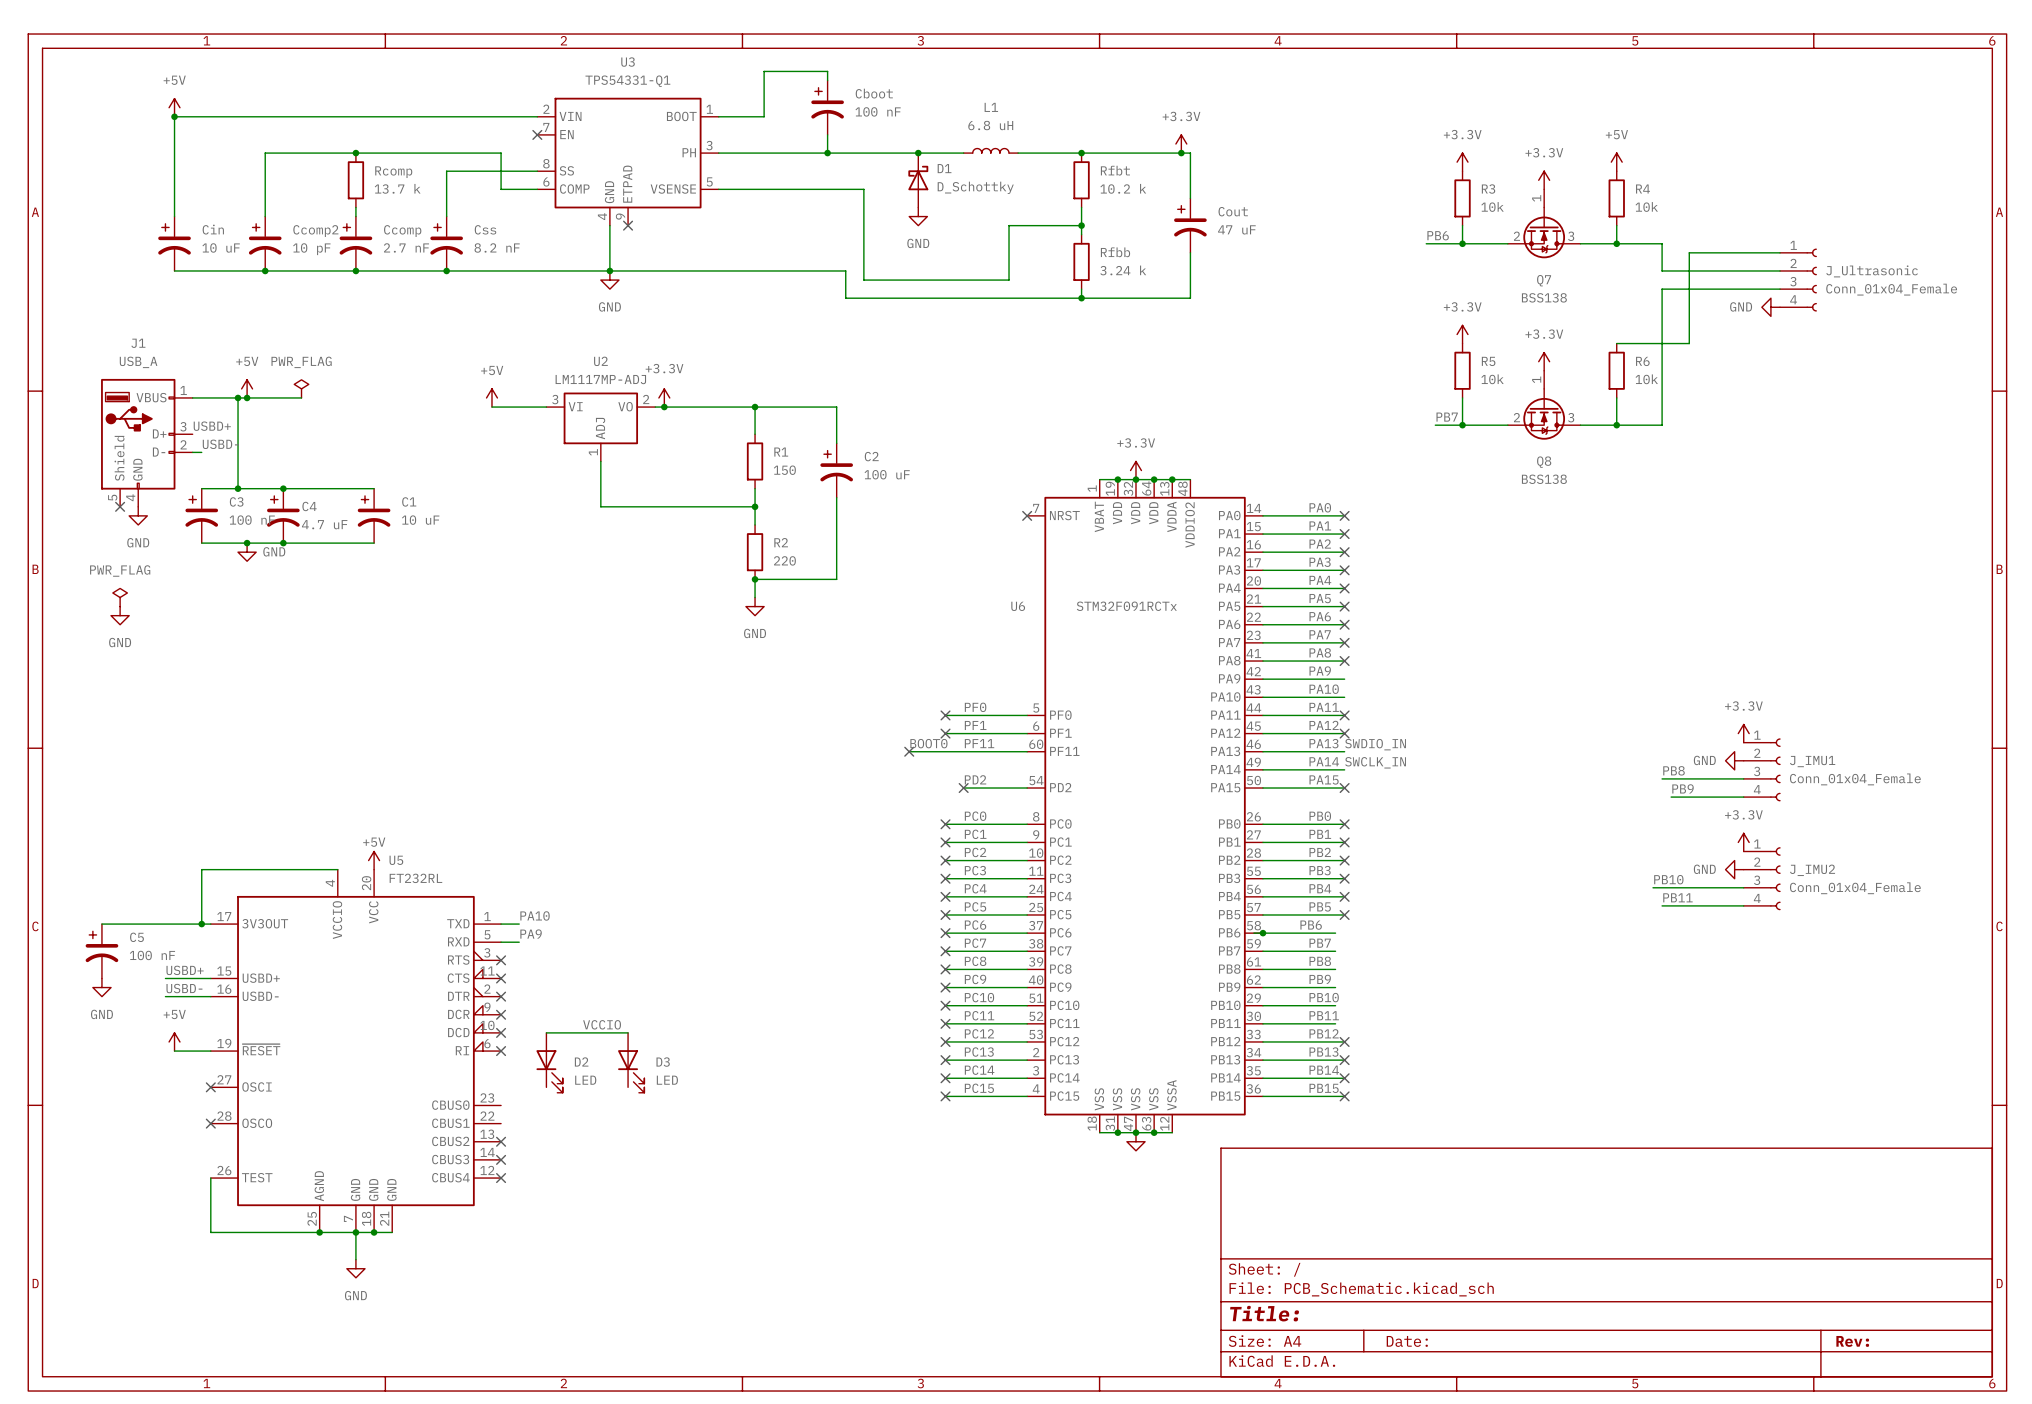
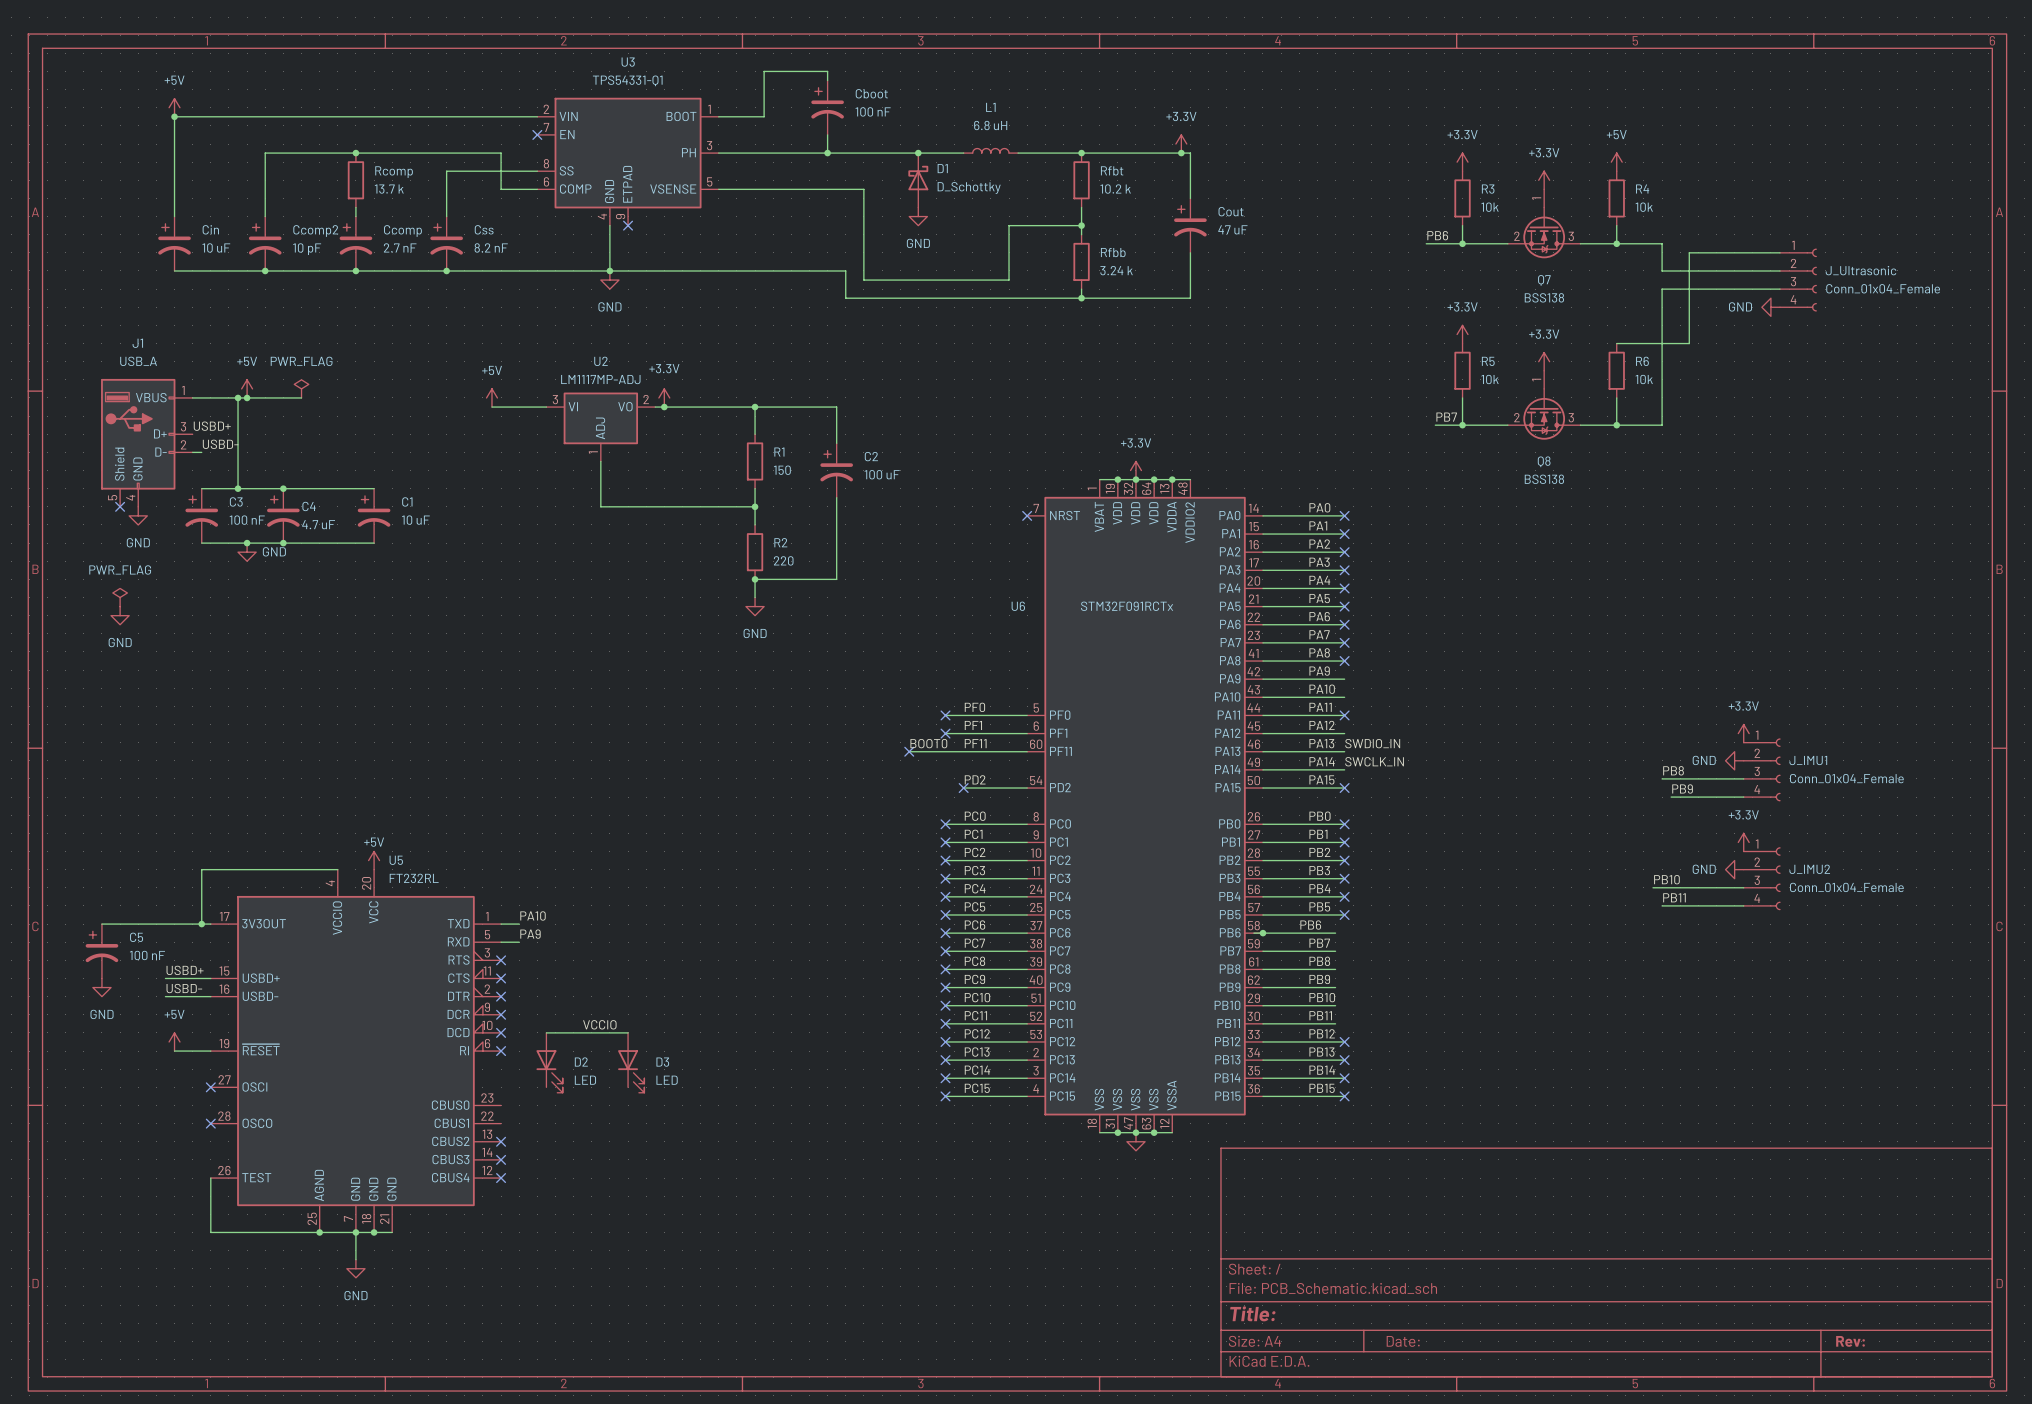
no-connect mark: (1344, 733) -> none

